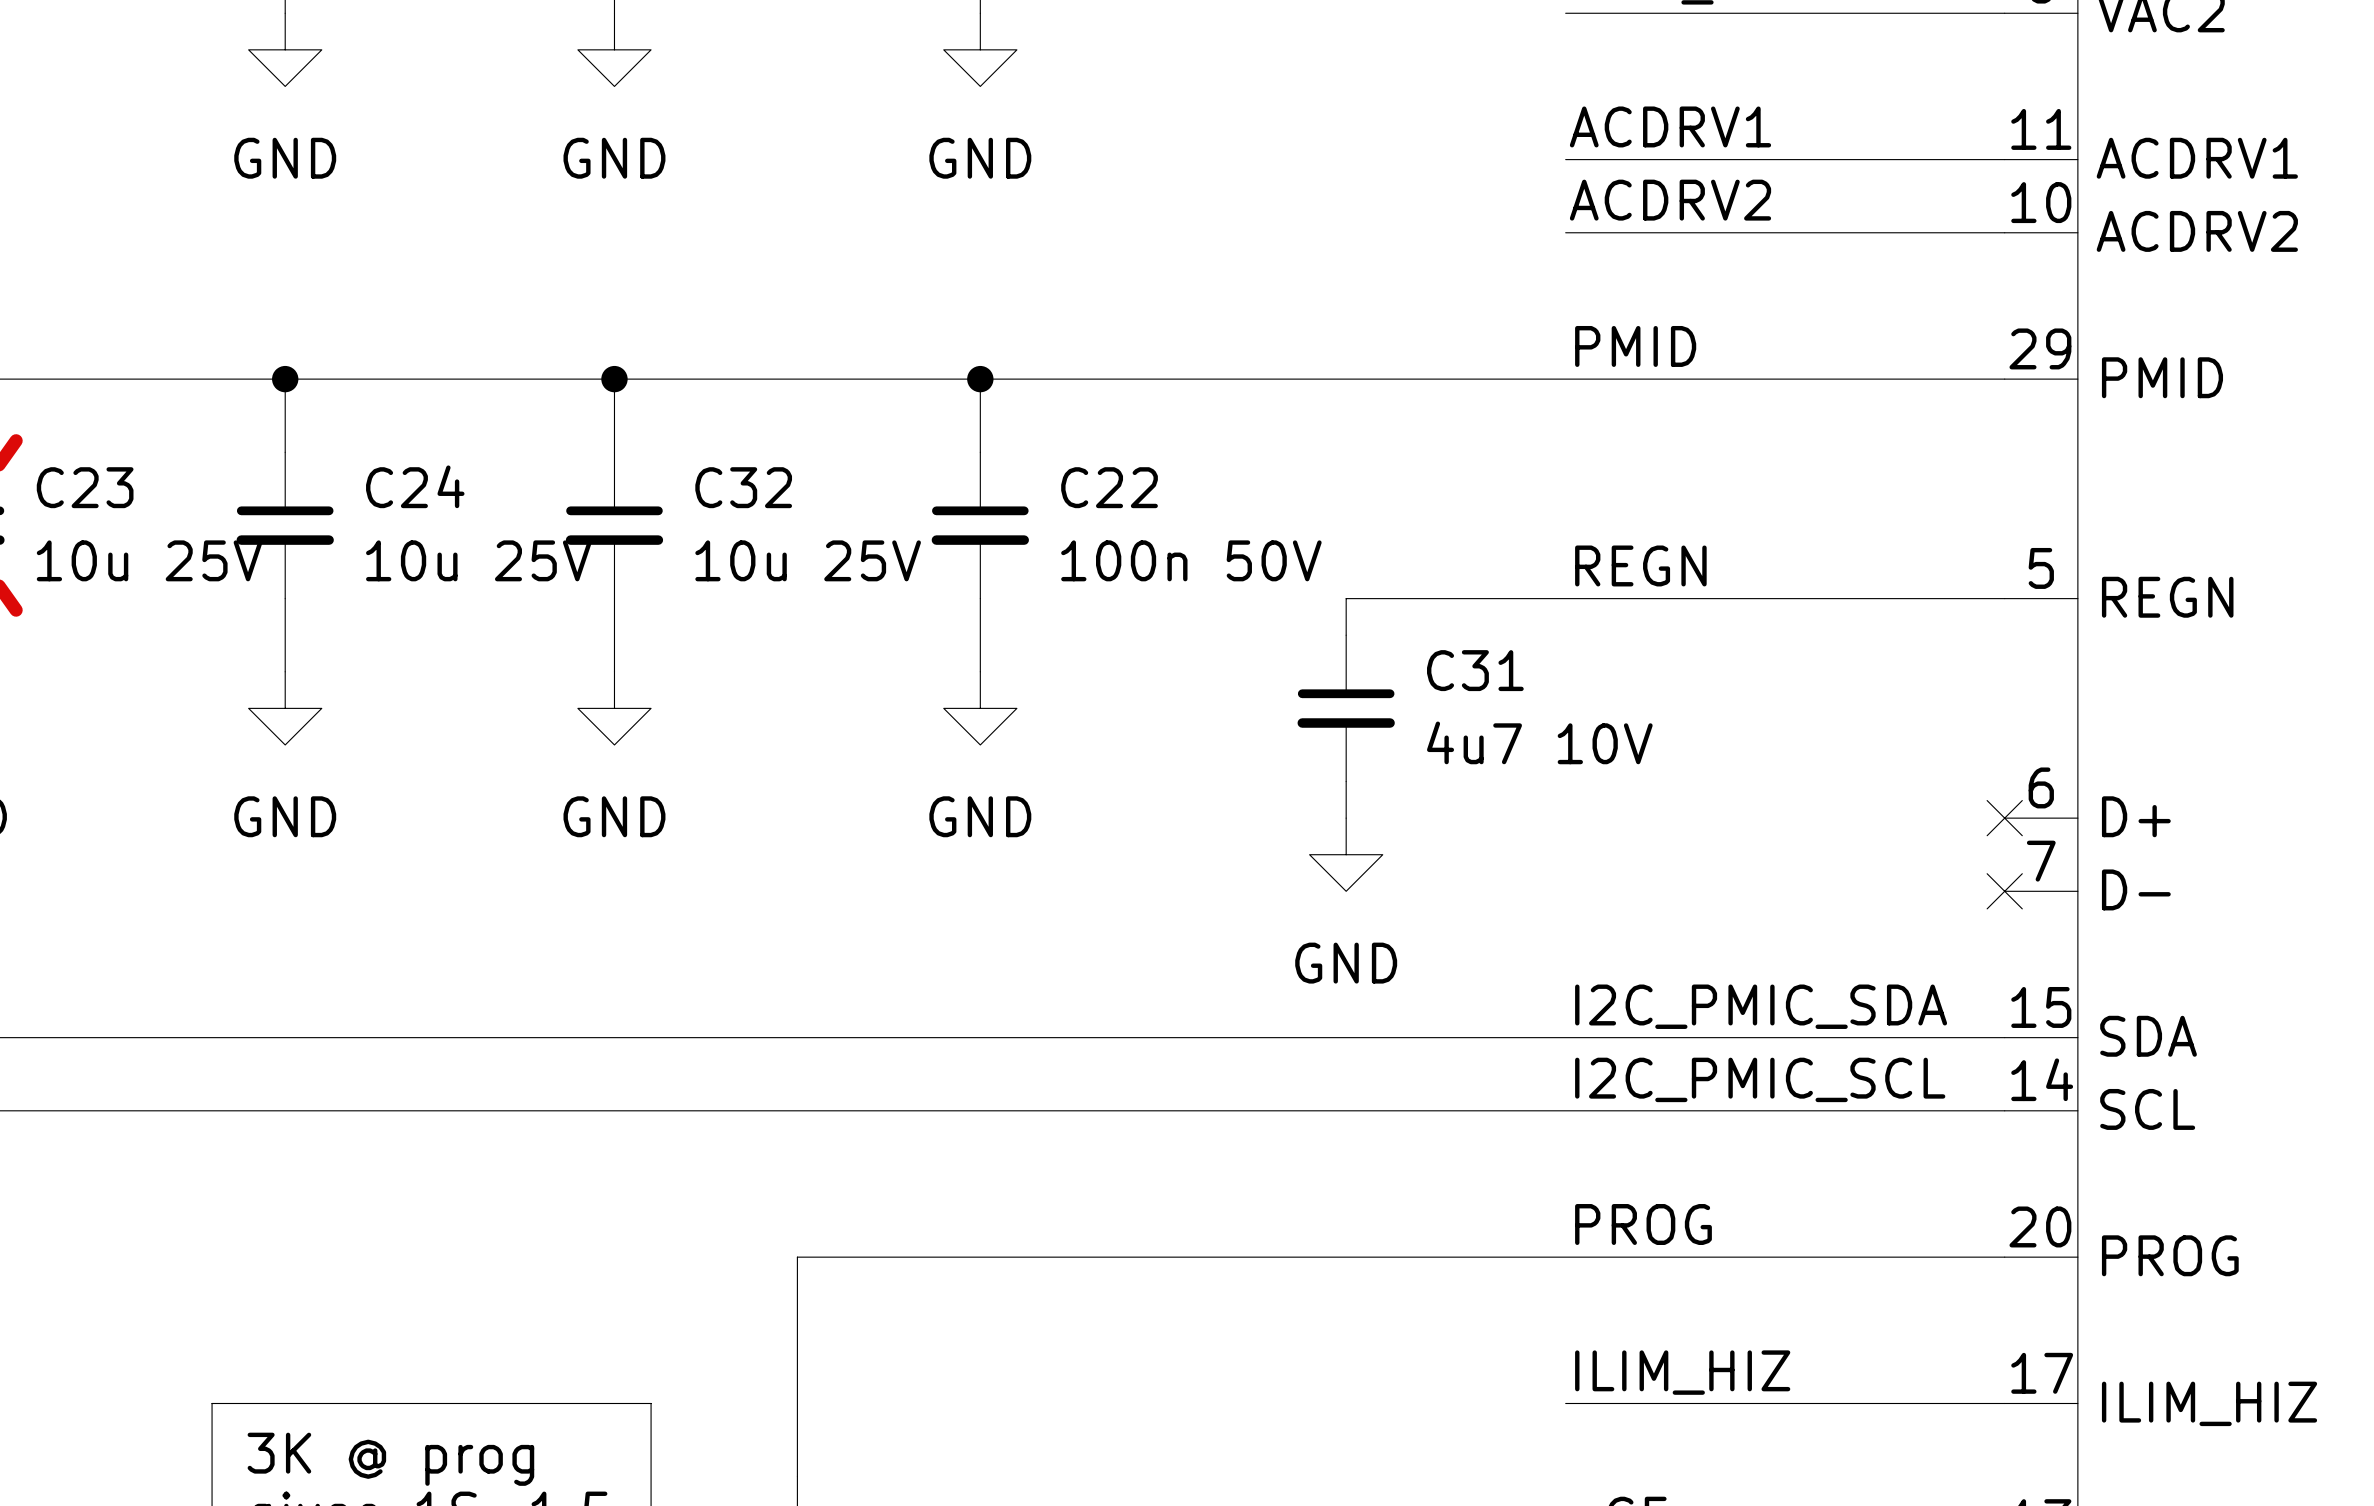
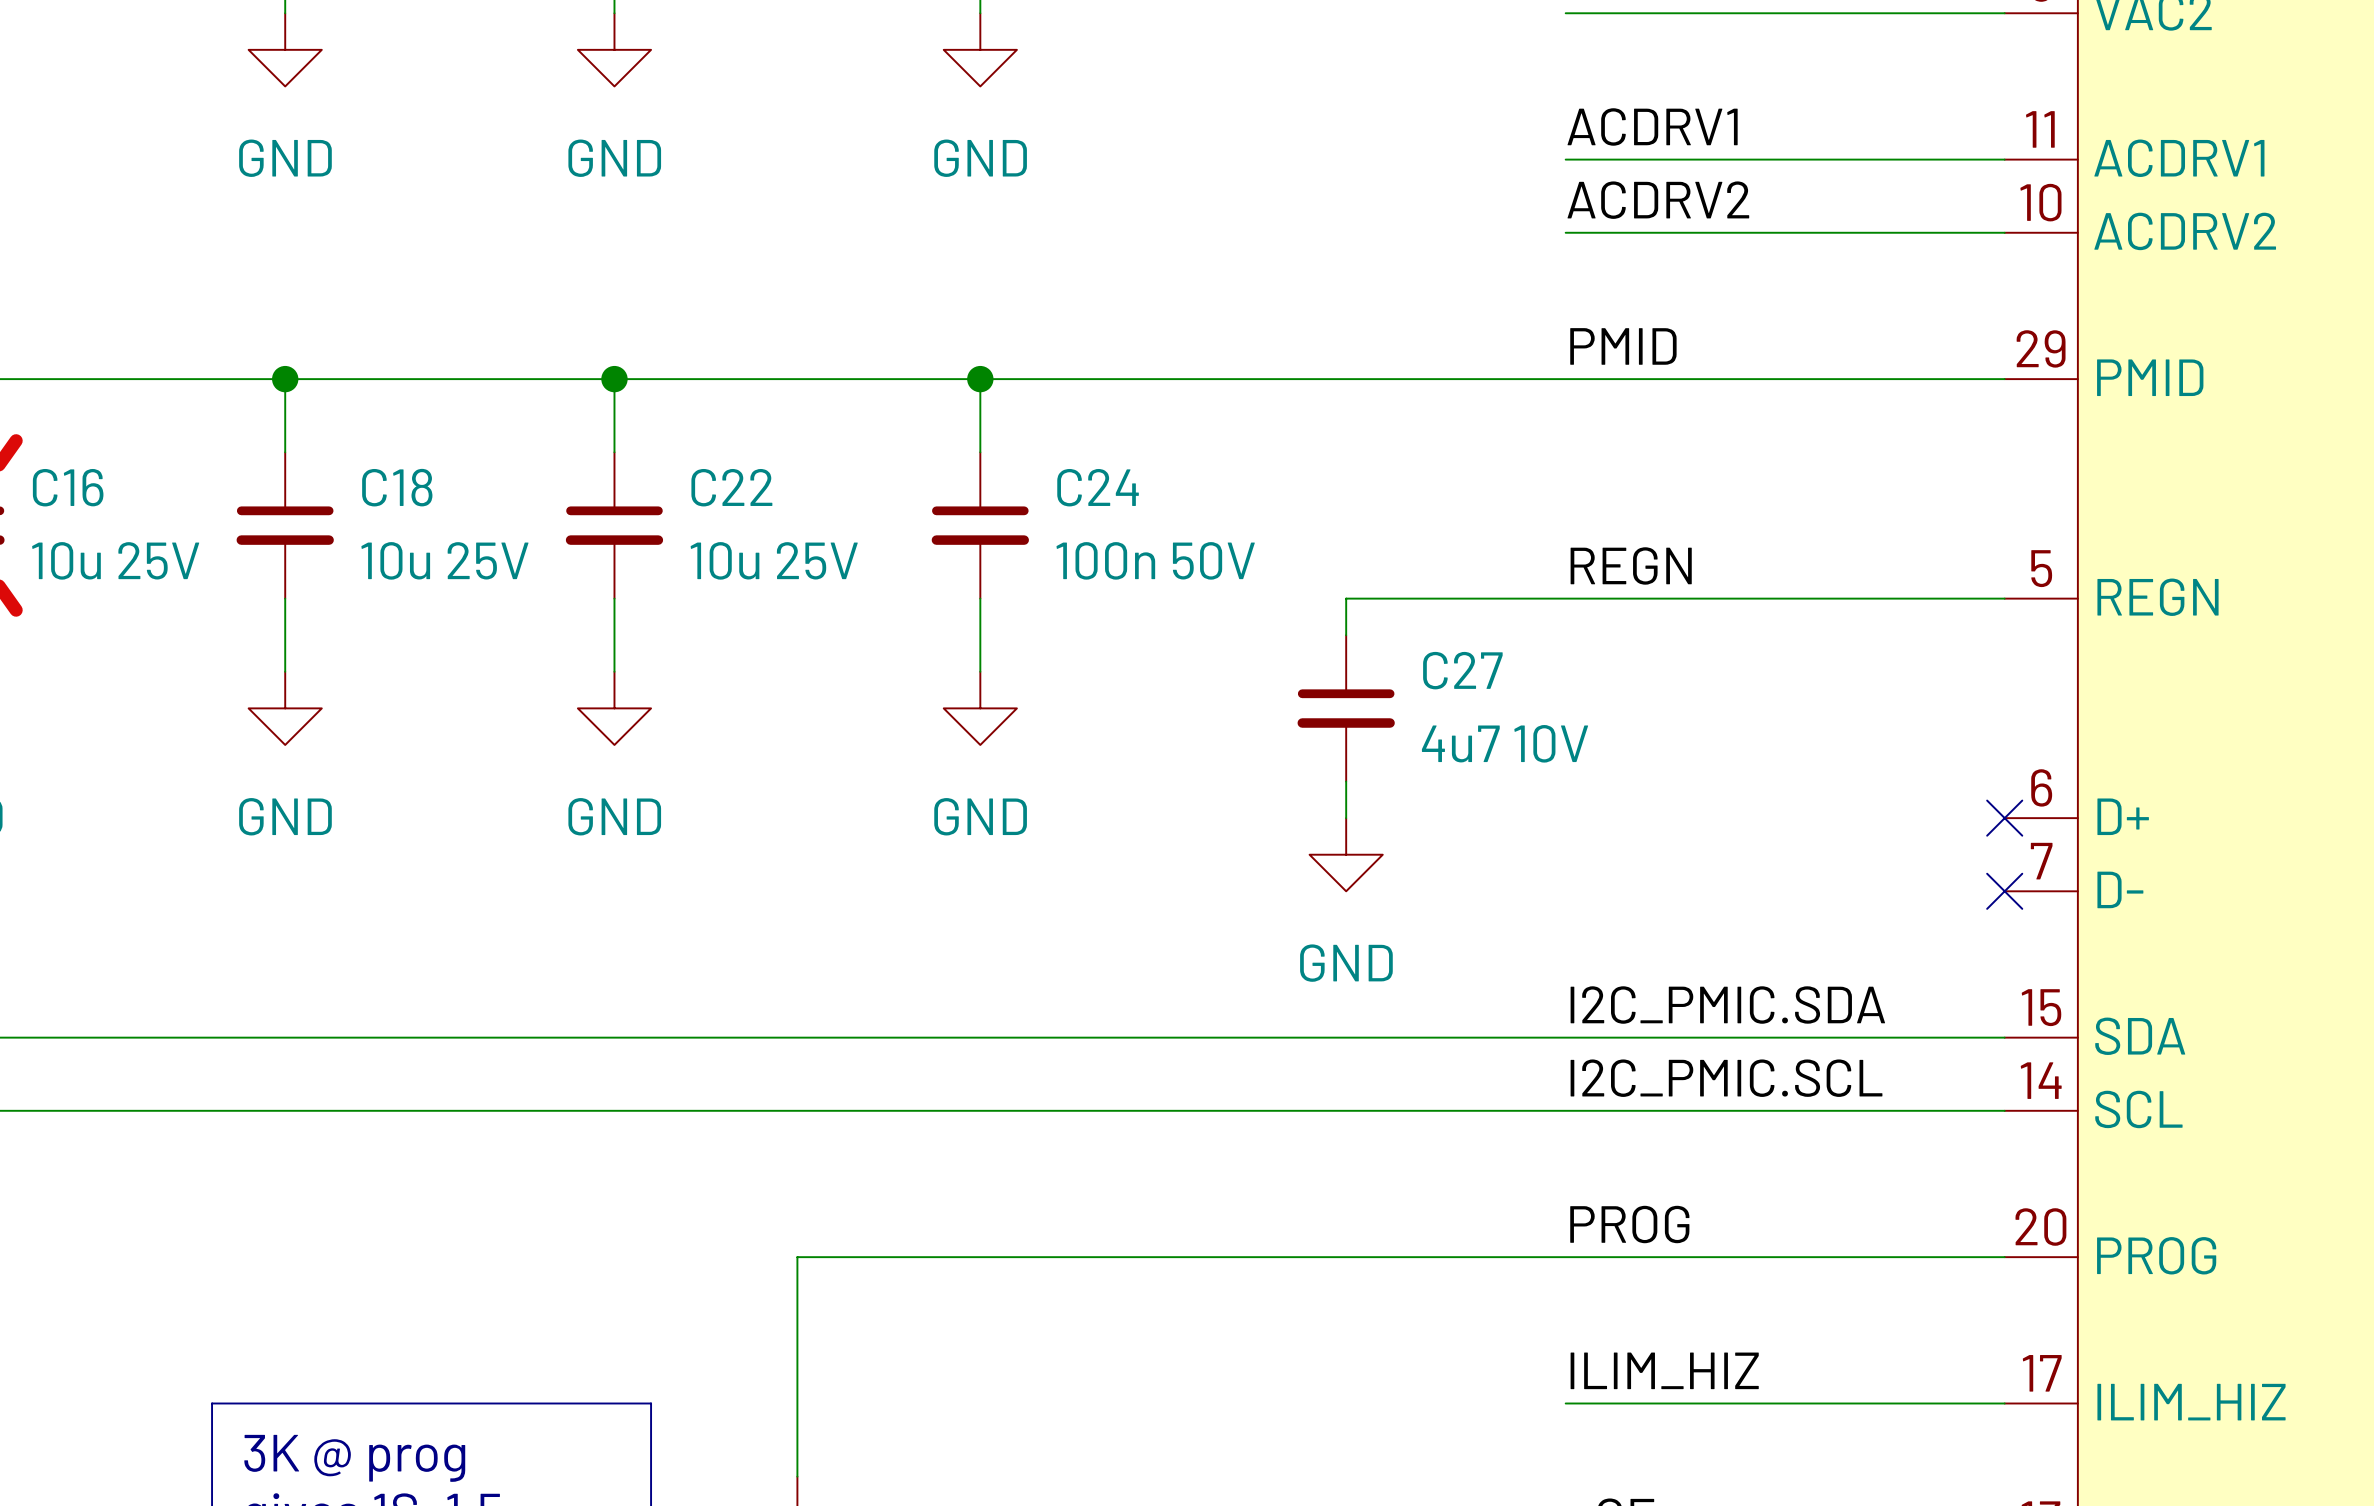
C24 name: C24 (415, 486) -> C18 (397, 487)
C23 name: C23 (85, 487) -> C16 (68, 487)
C32 name: C32 (743, 487) -> C22 (731, 487)
C22 name: C22 (1109, 487) -> C24 (1098, 487)
C31 name: C31 (1475, 670) -> C27 (1462, 670)
label: I2C_PMIC_SDA (1761, 1006) -> I2C_PMIC.SDA (1727, 1005)
label: I2C_PMIC_SCL (1760, 1079) -> I2C_PMIC.SCL (1726, 1078)

